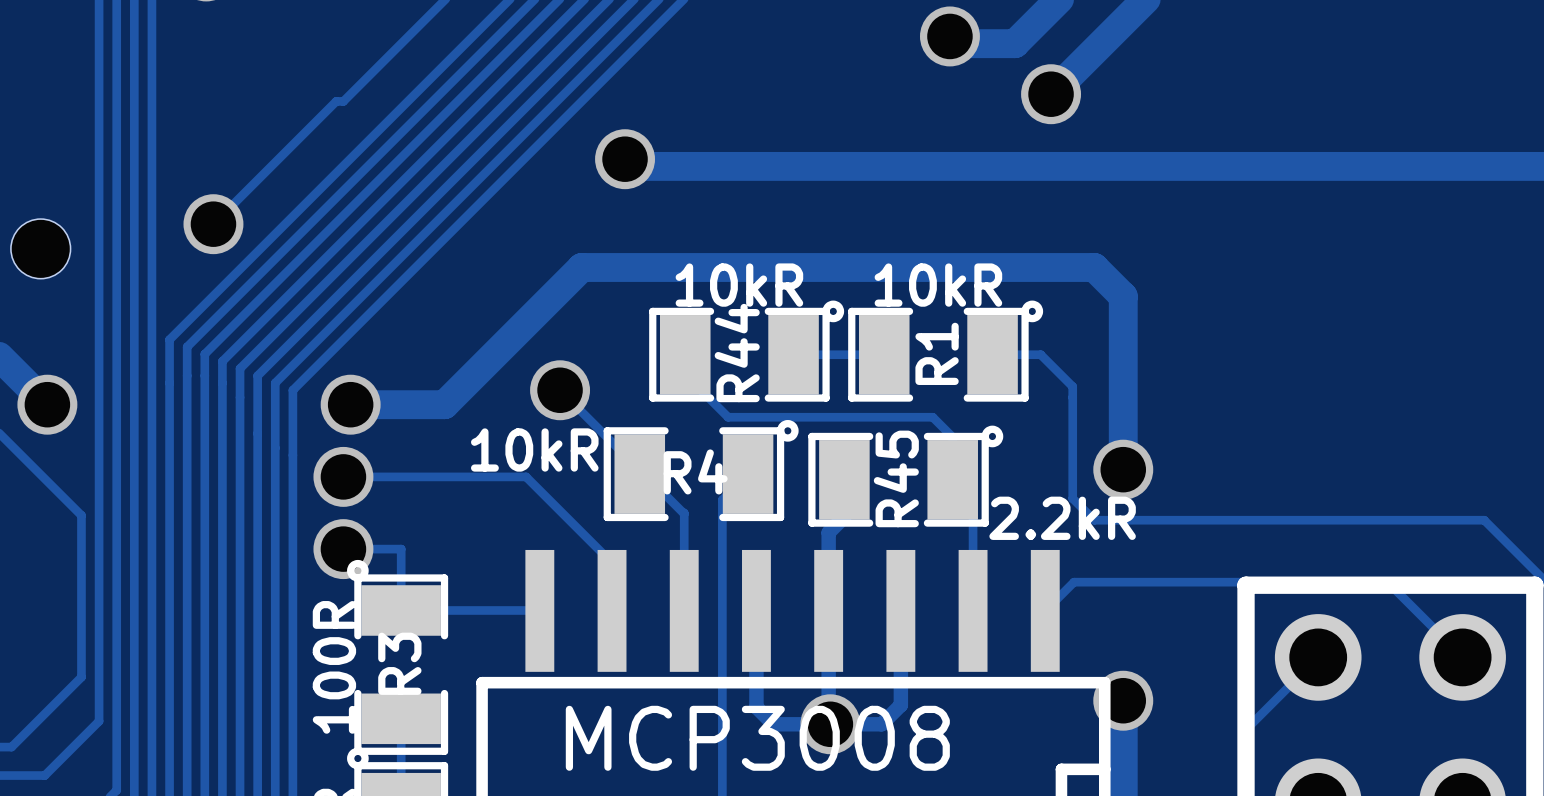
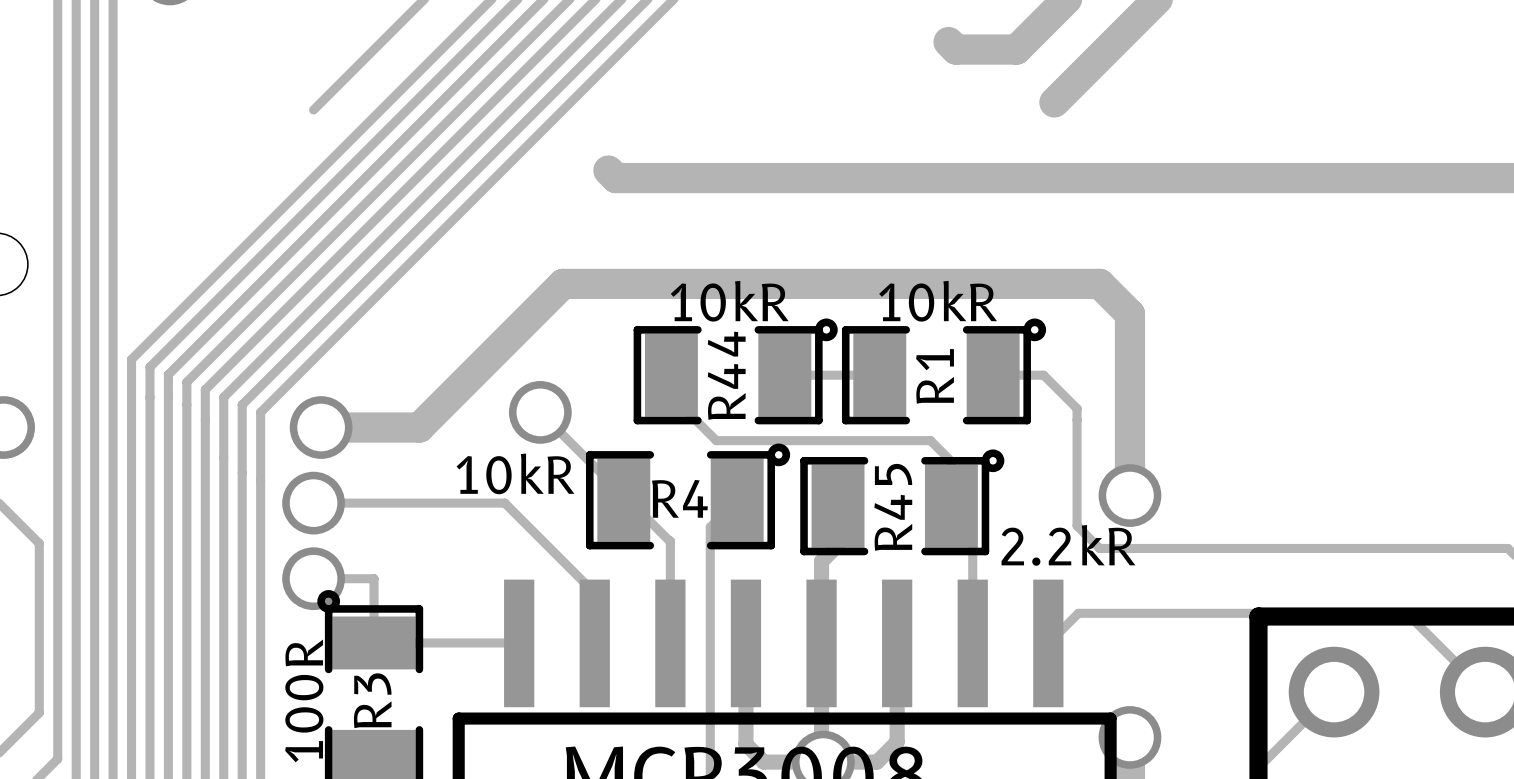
via: (949, 36) -> none
via: (1051, 94) -> none
track: (343, 101) (336, 101) (213, 224) -> none
via: (625, 159) -> none
via: (213, 224) -> none

